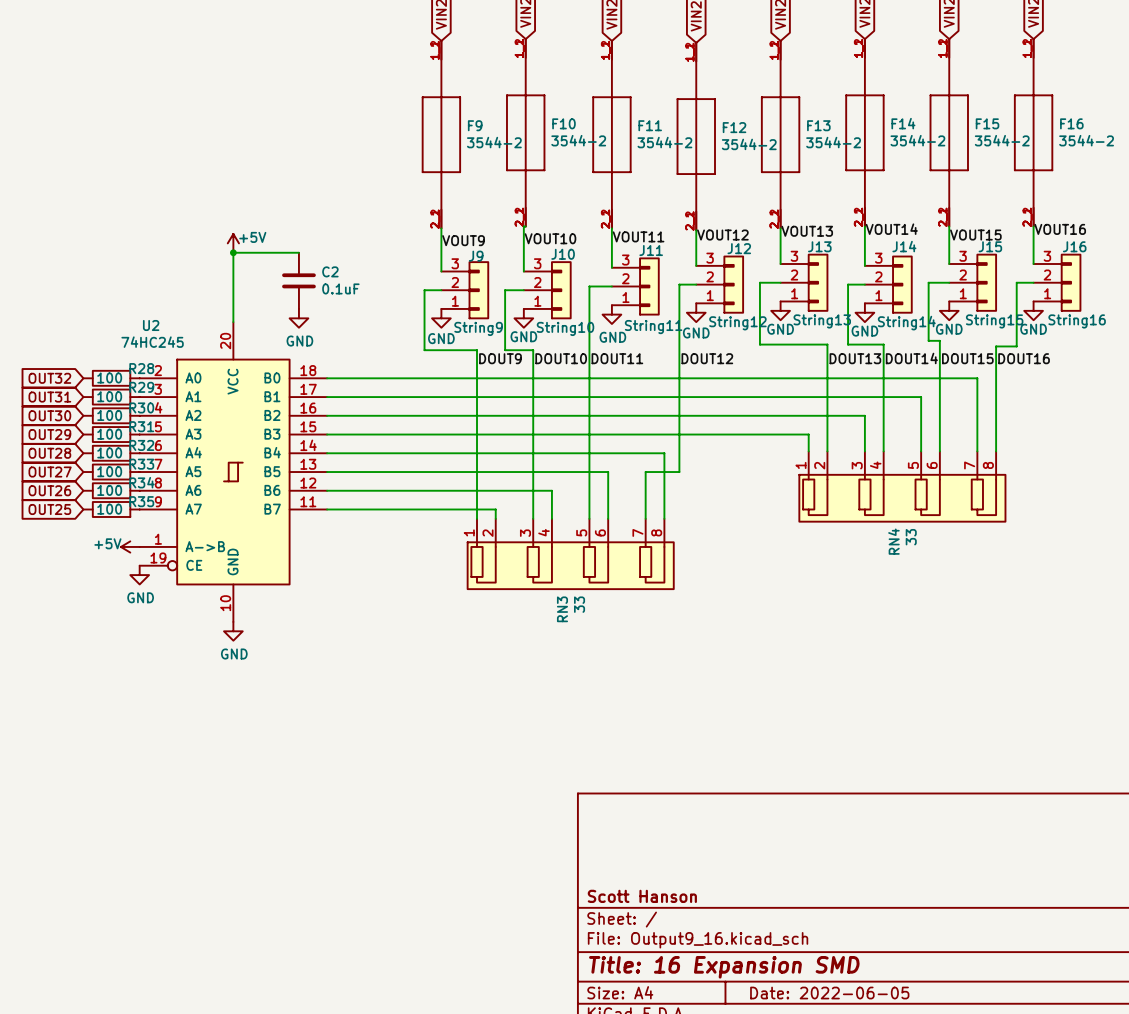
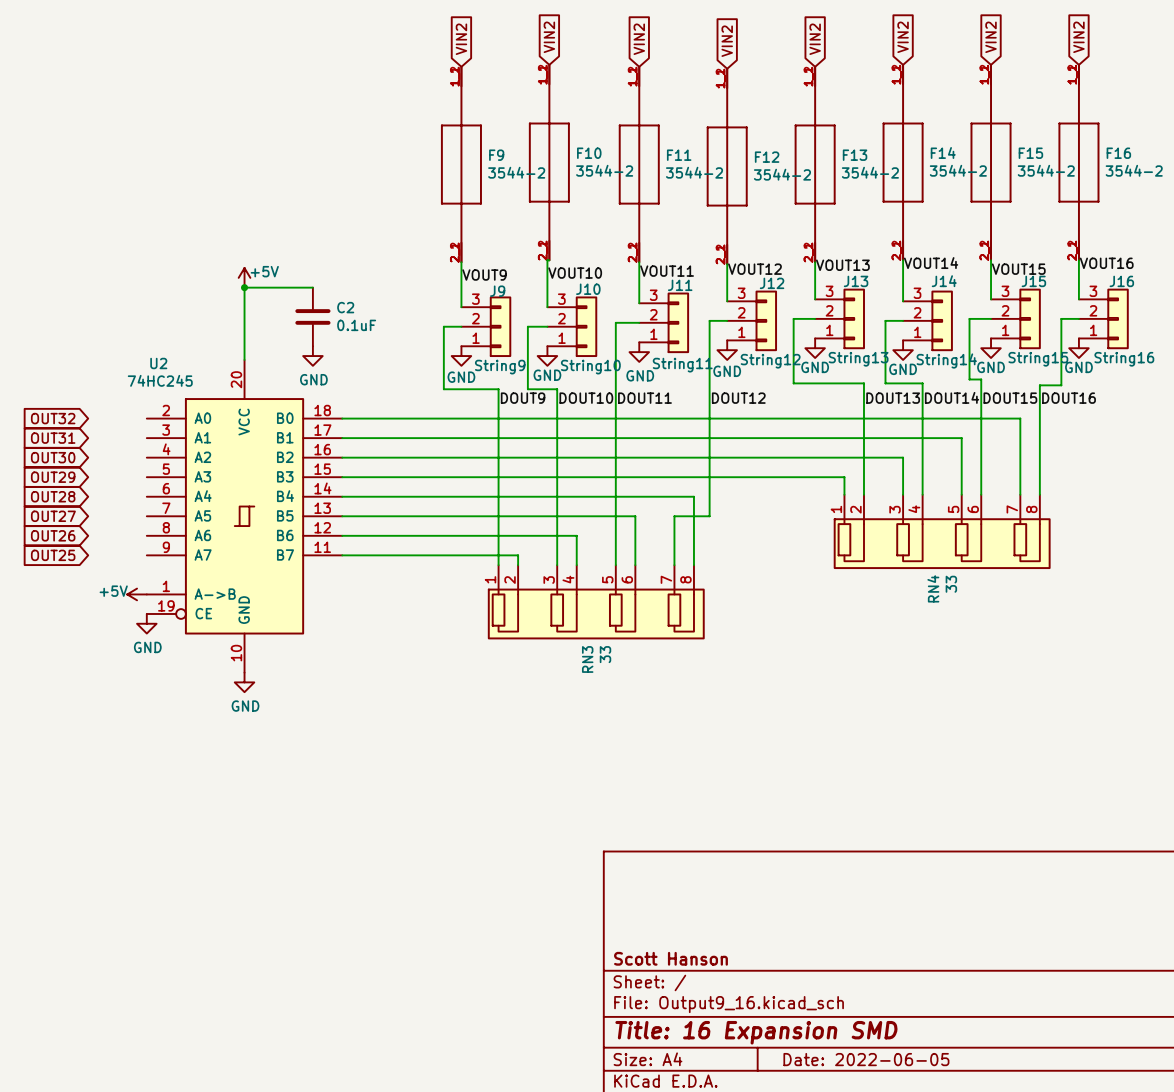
R28: 100 (111, 378) -> none
R29: 100 (111, 397) -> none
R30: 100 (111, 415) -> none
R31: 100 (111, 434) -> none
R32: 100 (111, 453) -> none
R33: 100 (111, 472) -> none
R34: 100 (111, 490) -> none
R35: 100 (111, 509) -> none

